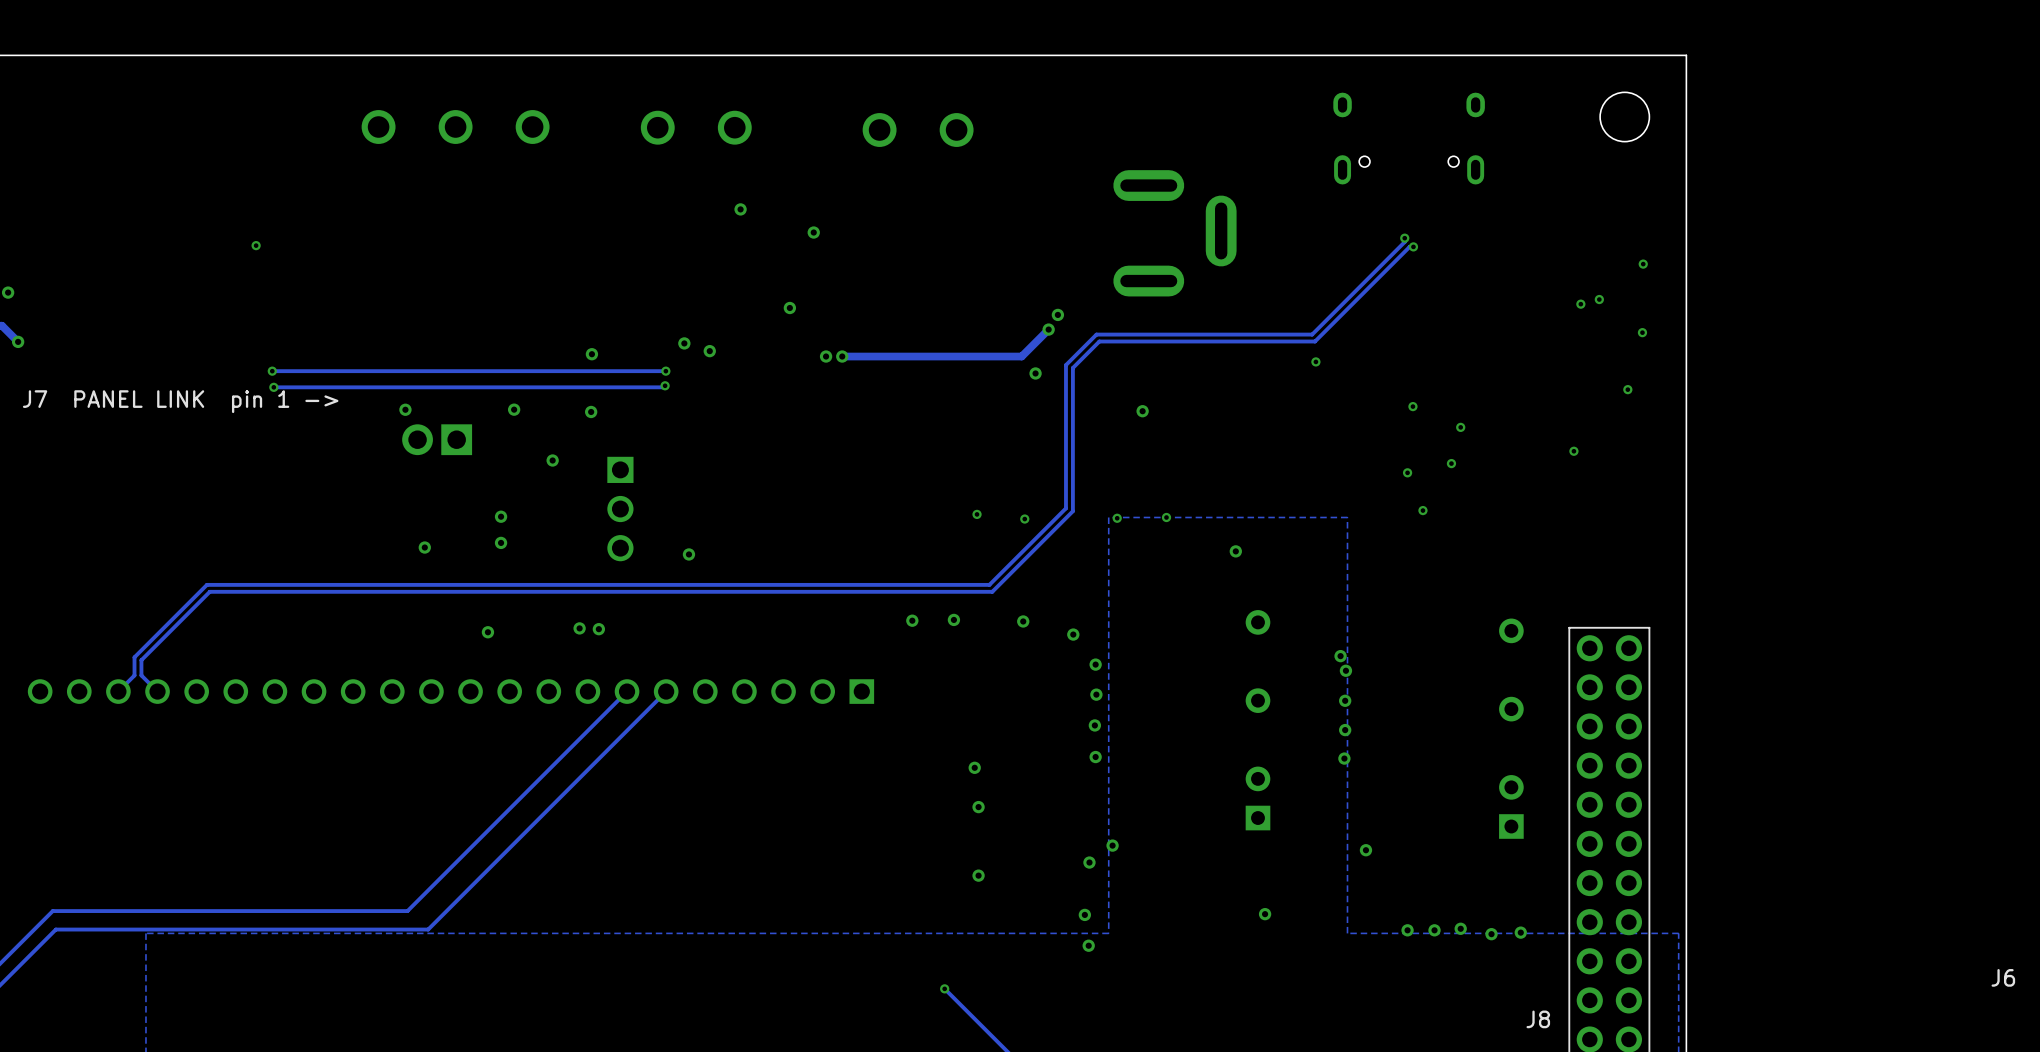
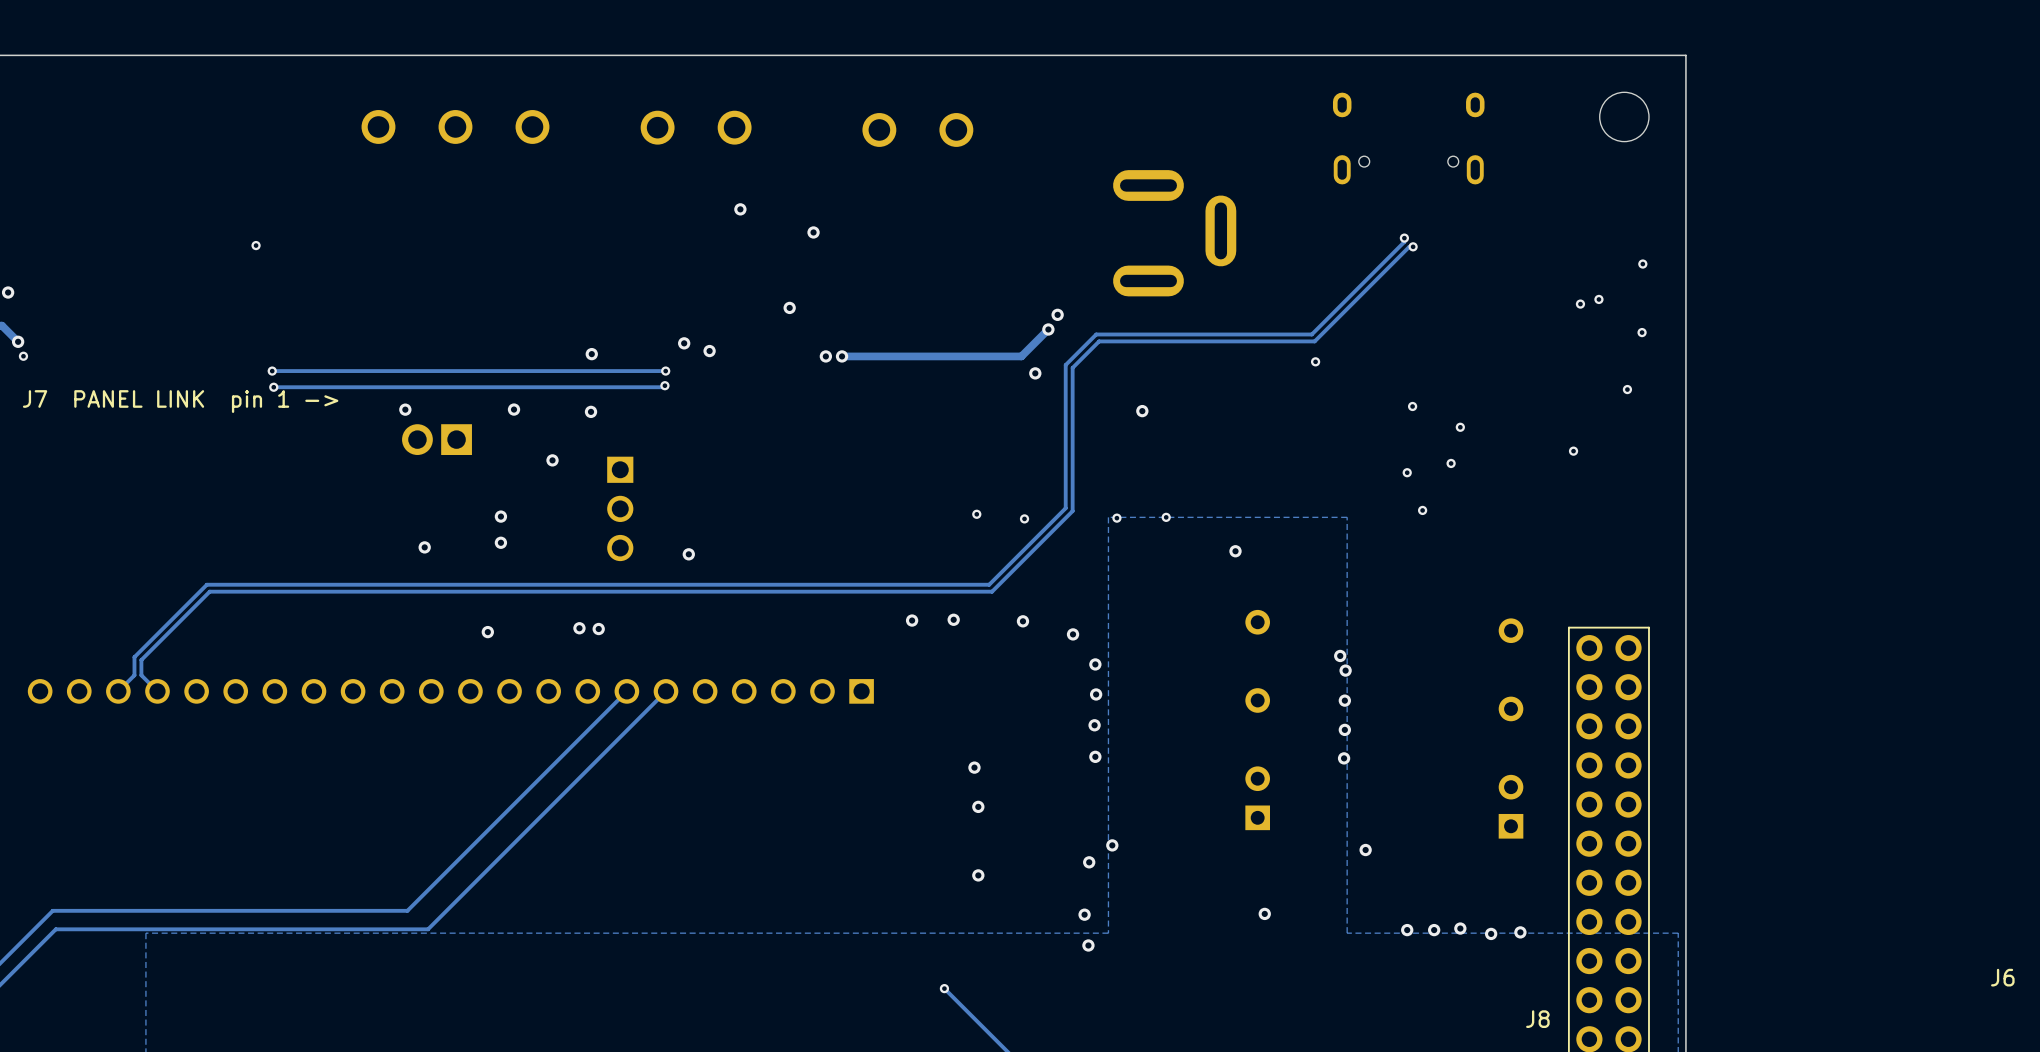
via: none -> (23, 356)

